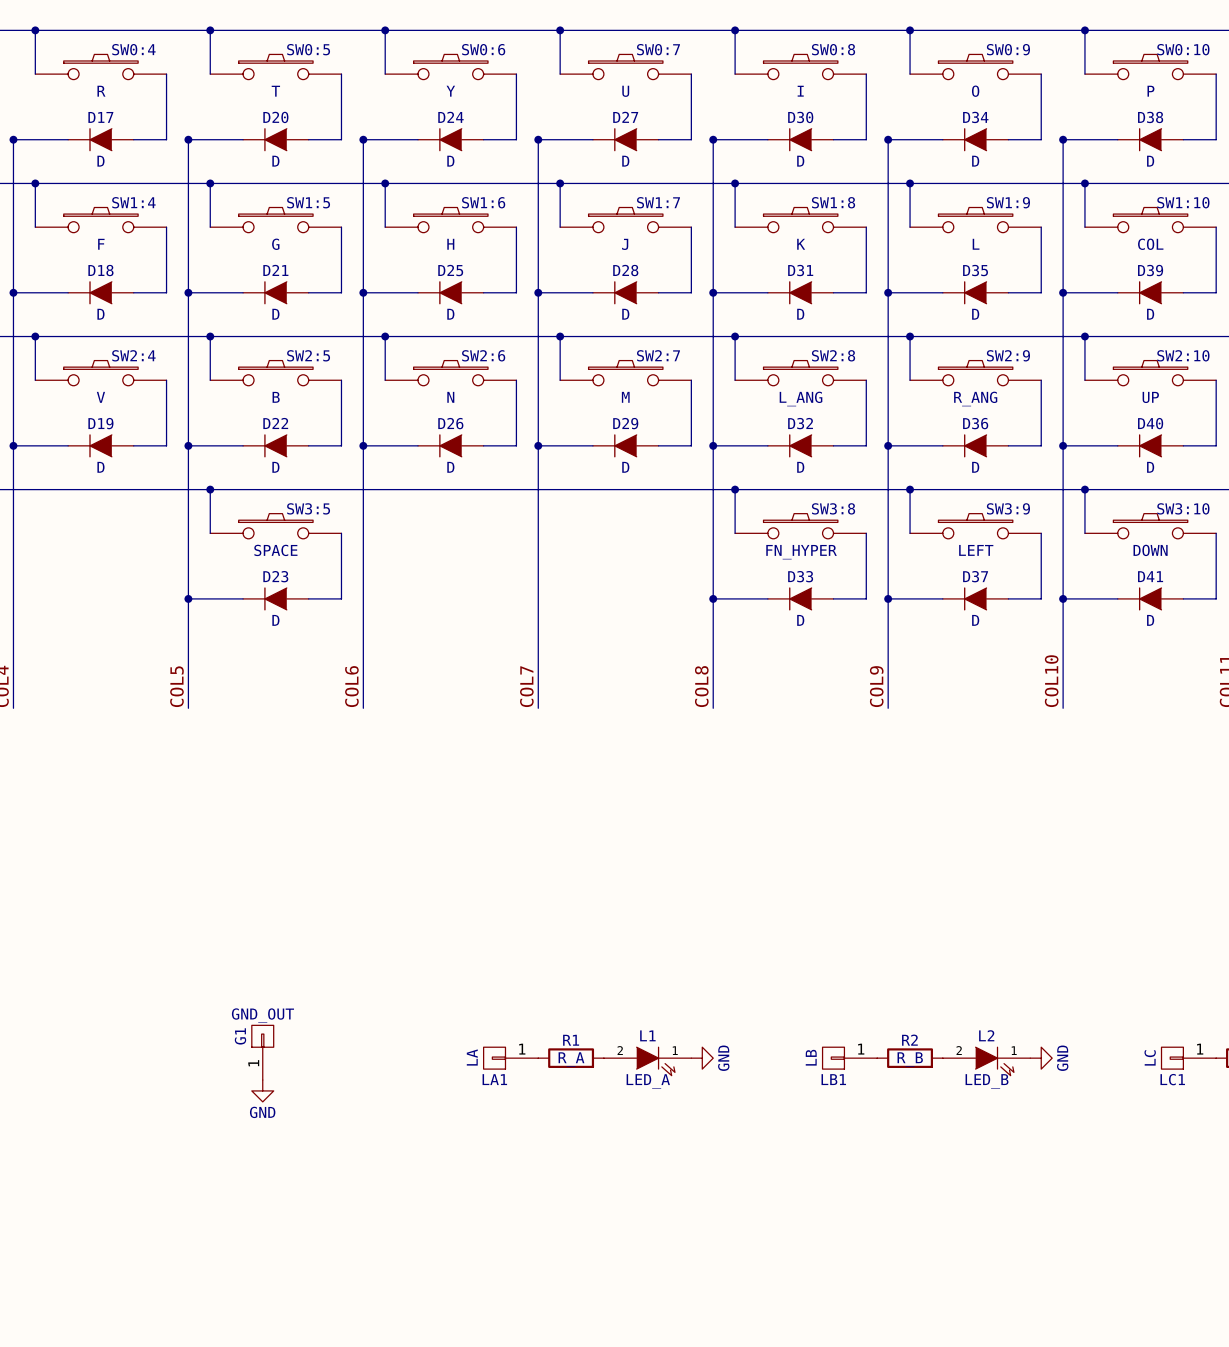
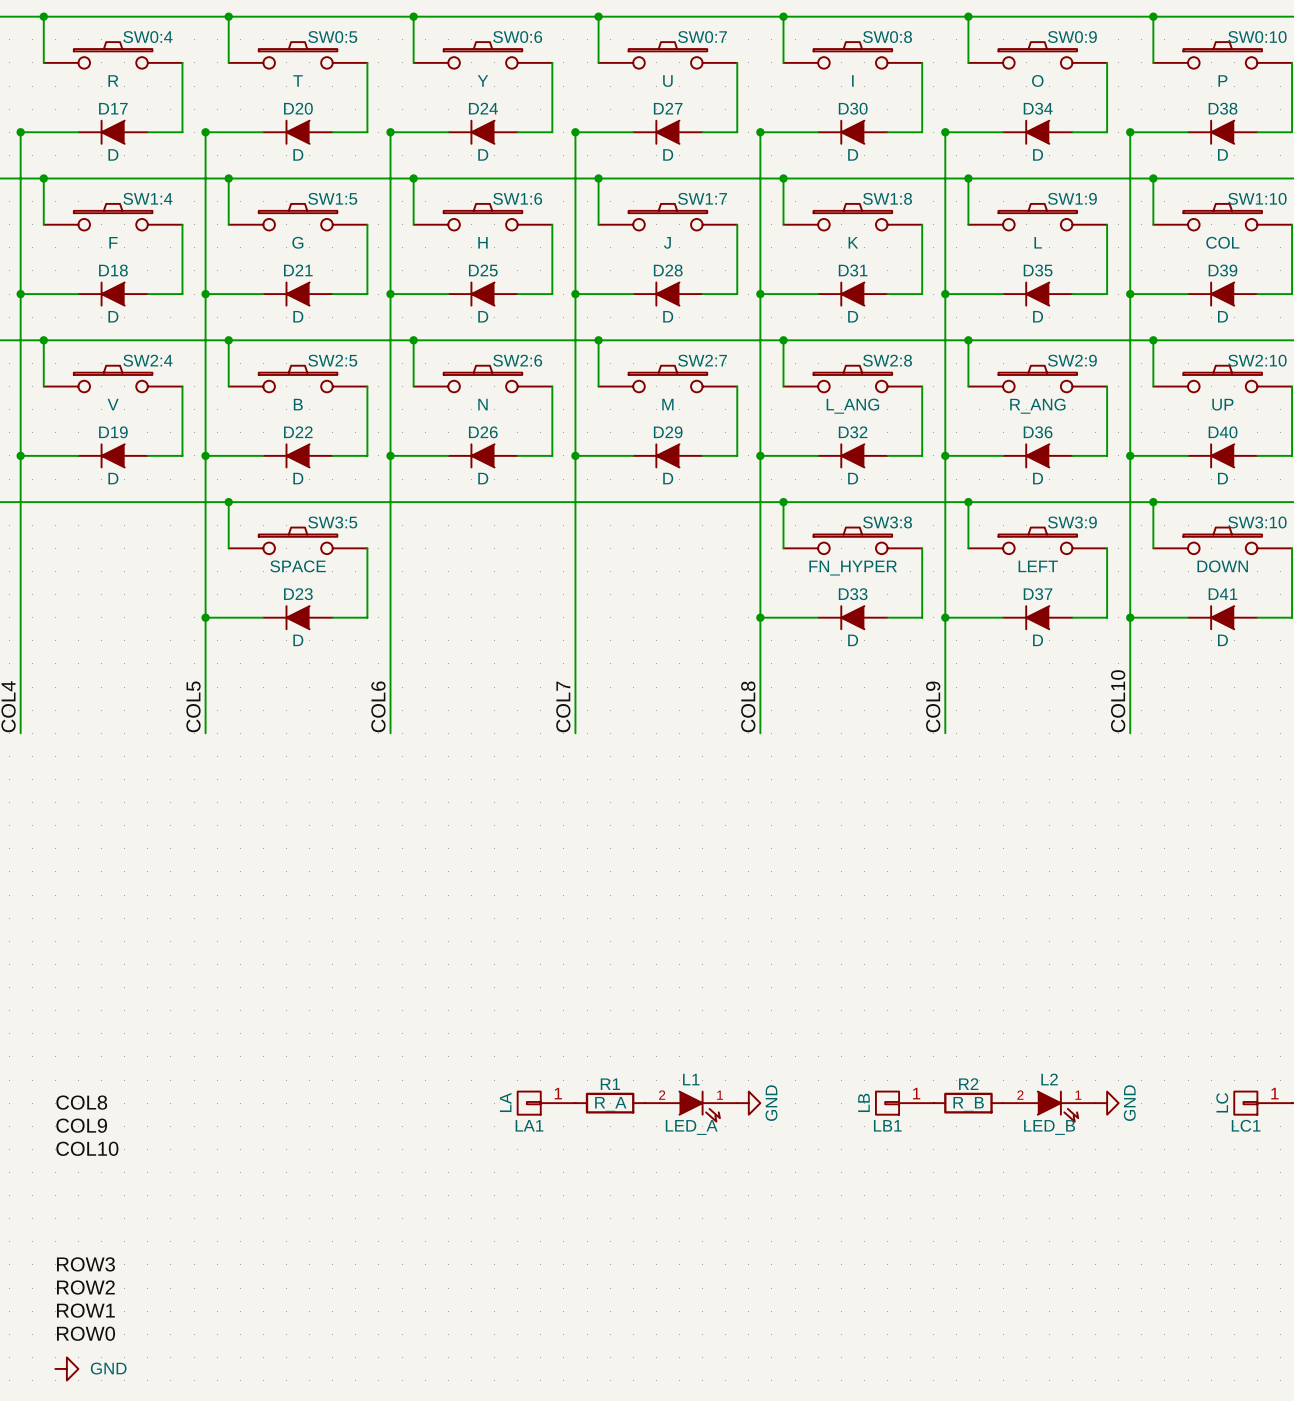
G1: GND_OUT (262, 1052) -> none
label: none -> COL8 (81, 1102)
label: none -> COL9 (81, 1125)
power symbol: GND (262, 1090) -> none
label: none -> COL10 (87, 1148)
label: none -> ROW3 (85, 1264)
label: none -> ROW2 (85, 1287)
label: none -> ROW1 (85, 1310)
label: none -> ROW0 (86, 1333)
power symbol: none -> GND (66, 1368)

